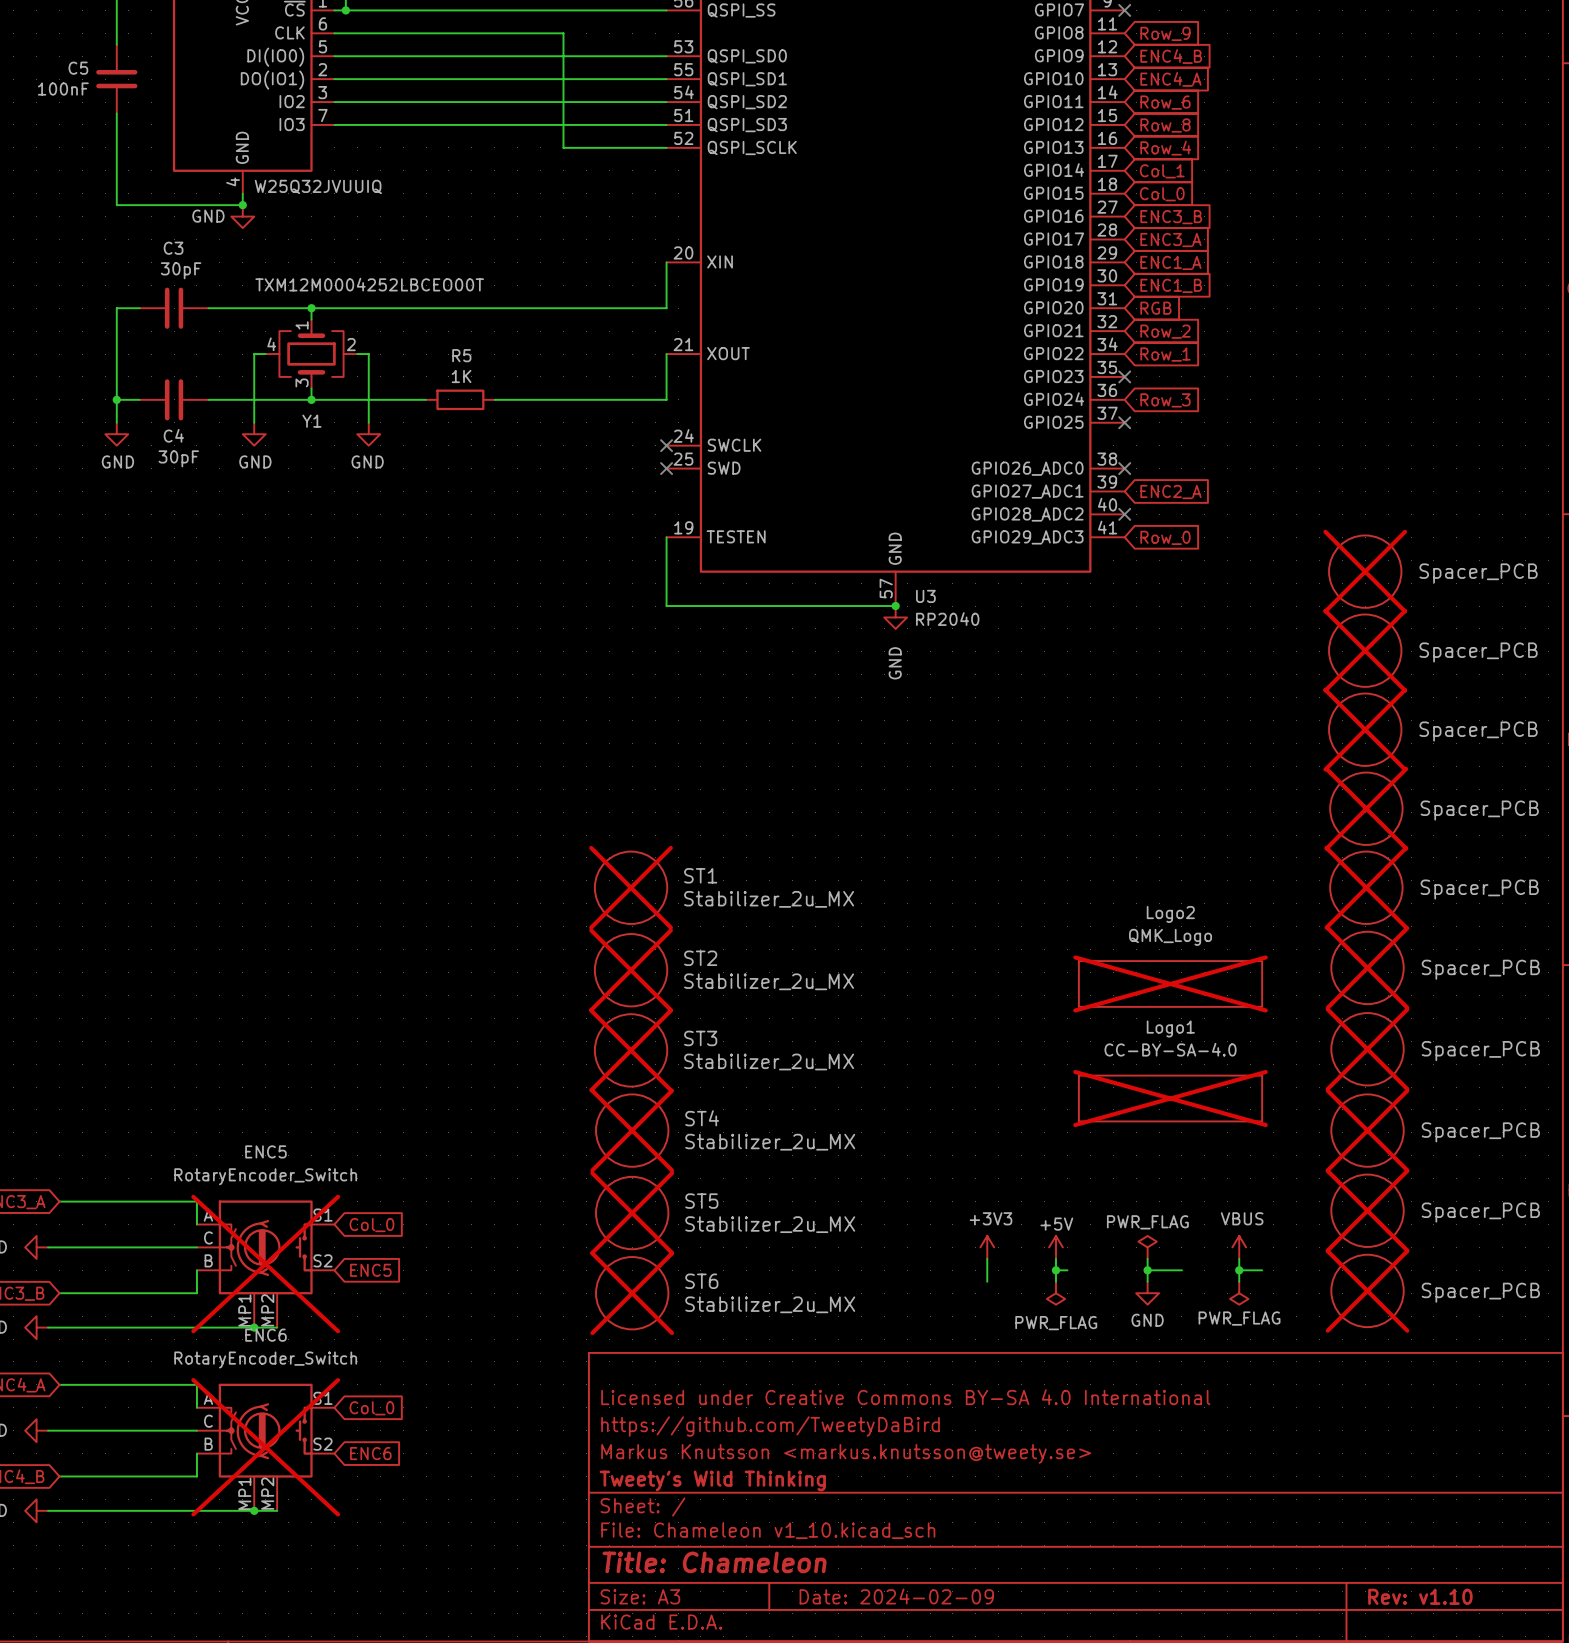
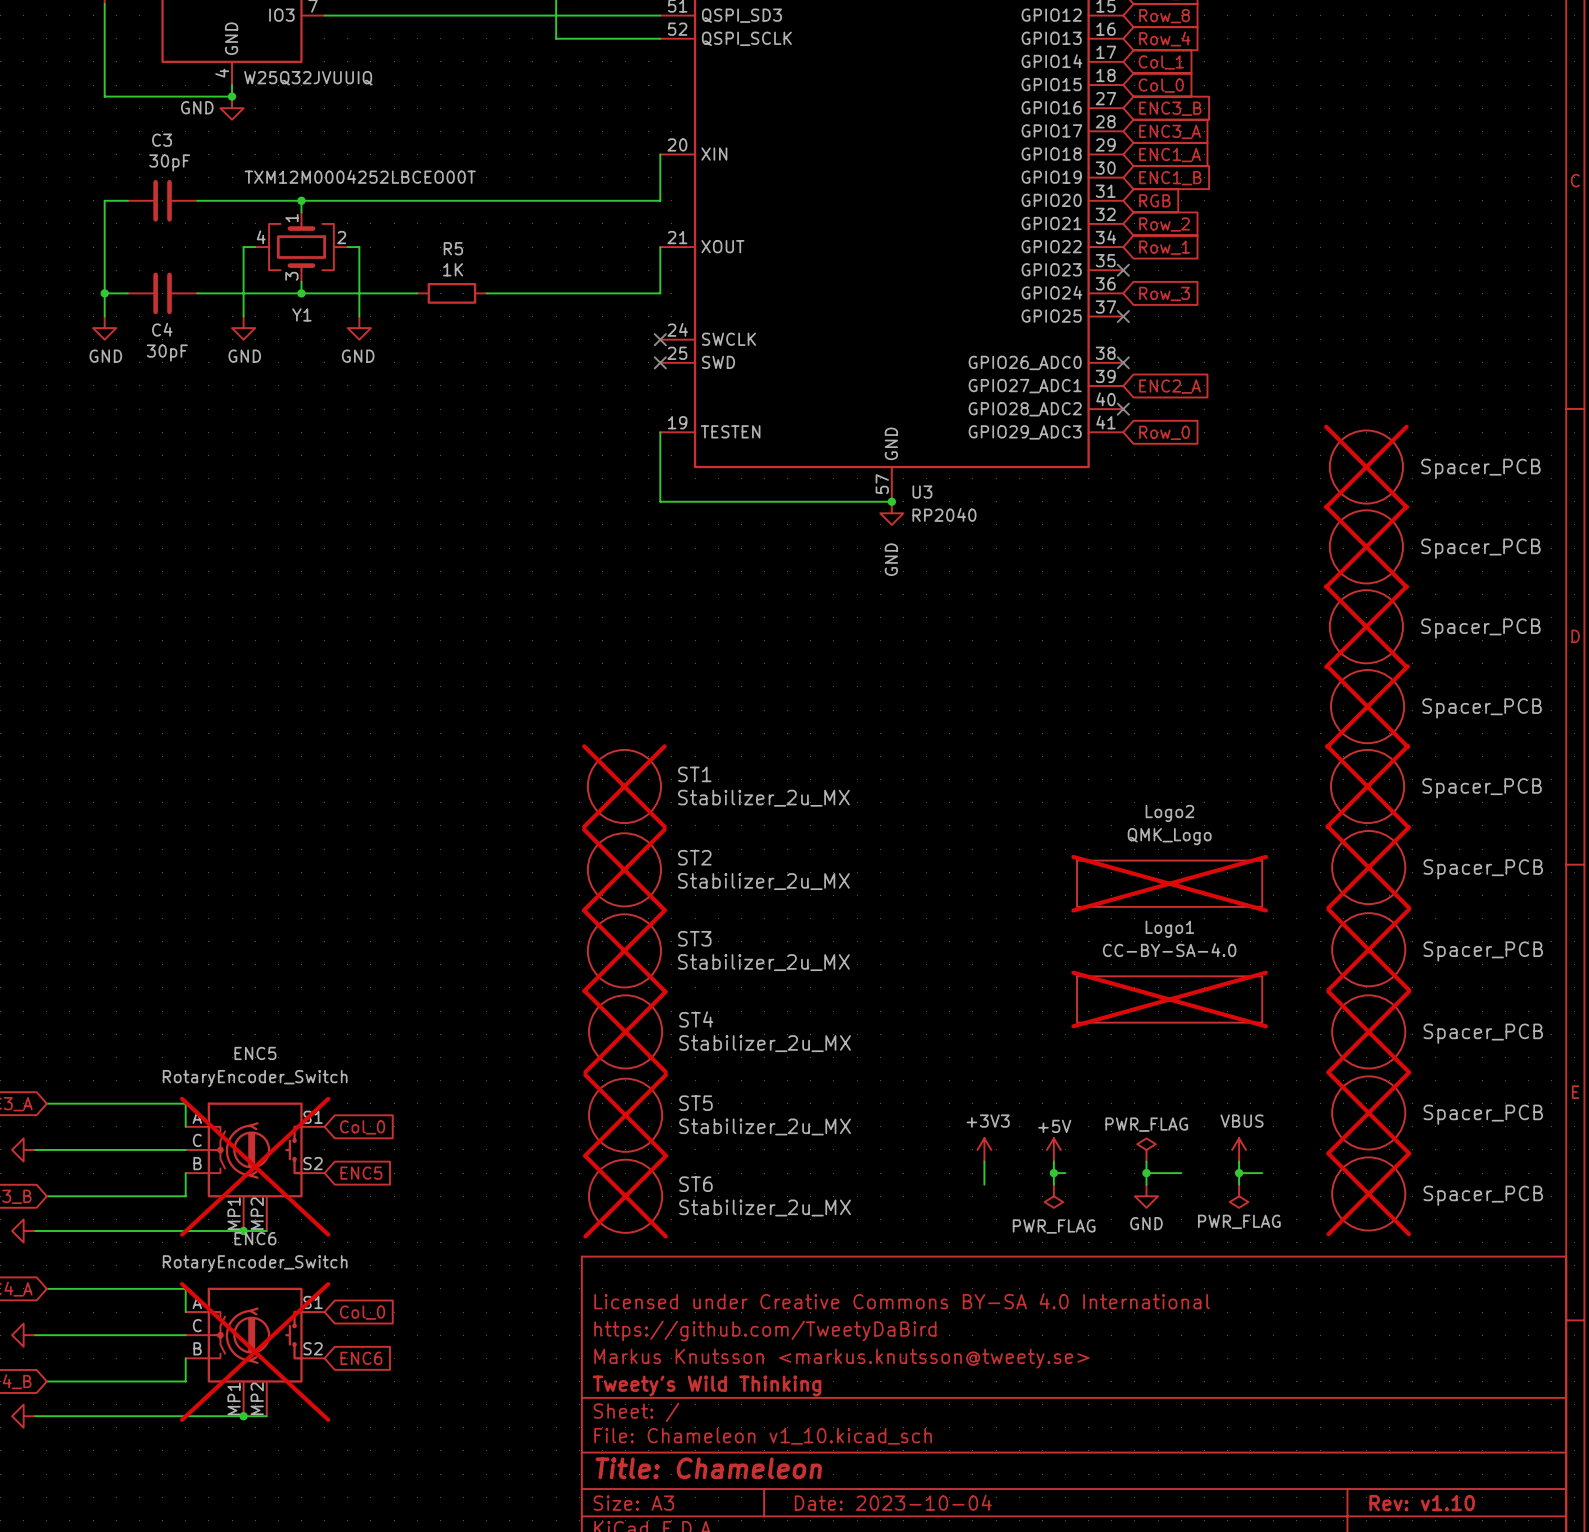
title block: Date: 2024-02-09 (896, 1596) -> Date: 2023-10-04 (893, 1502)

